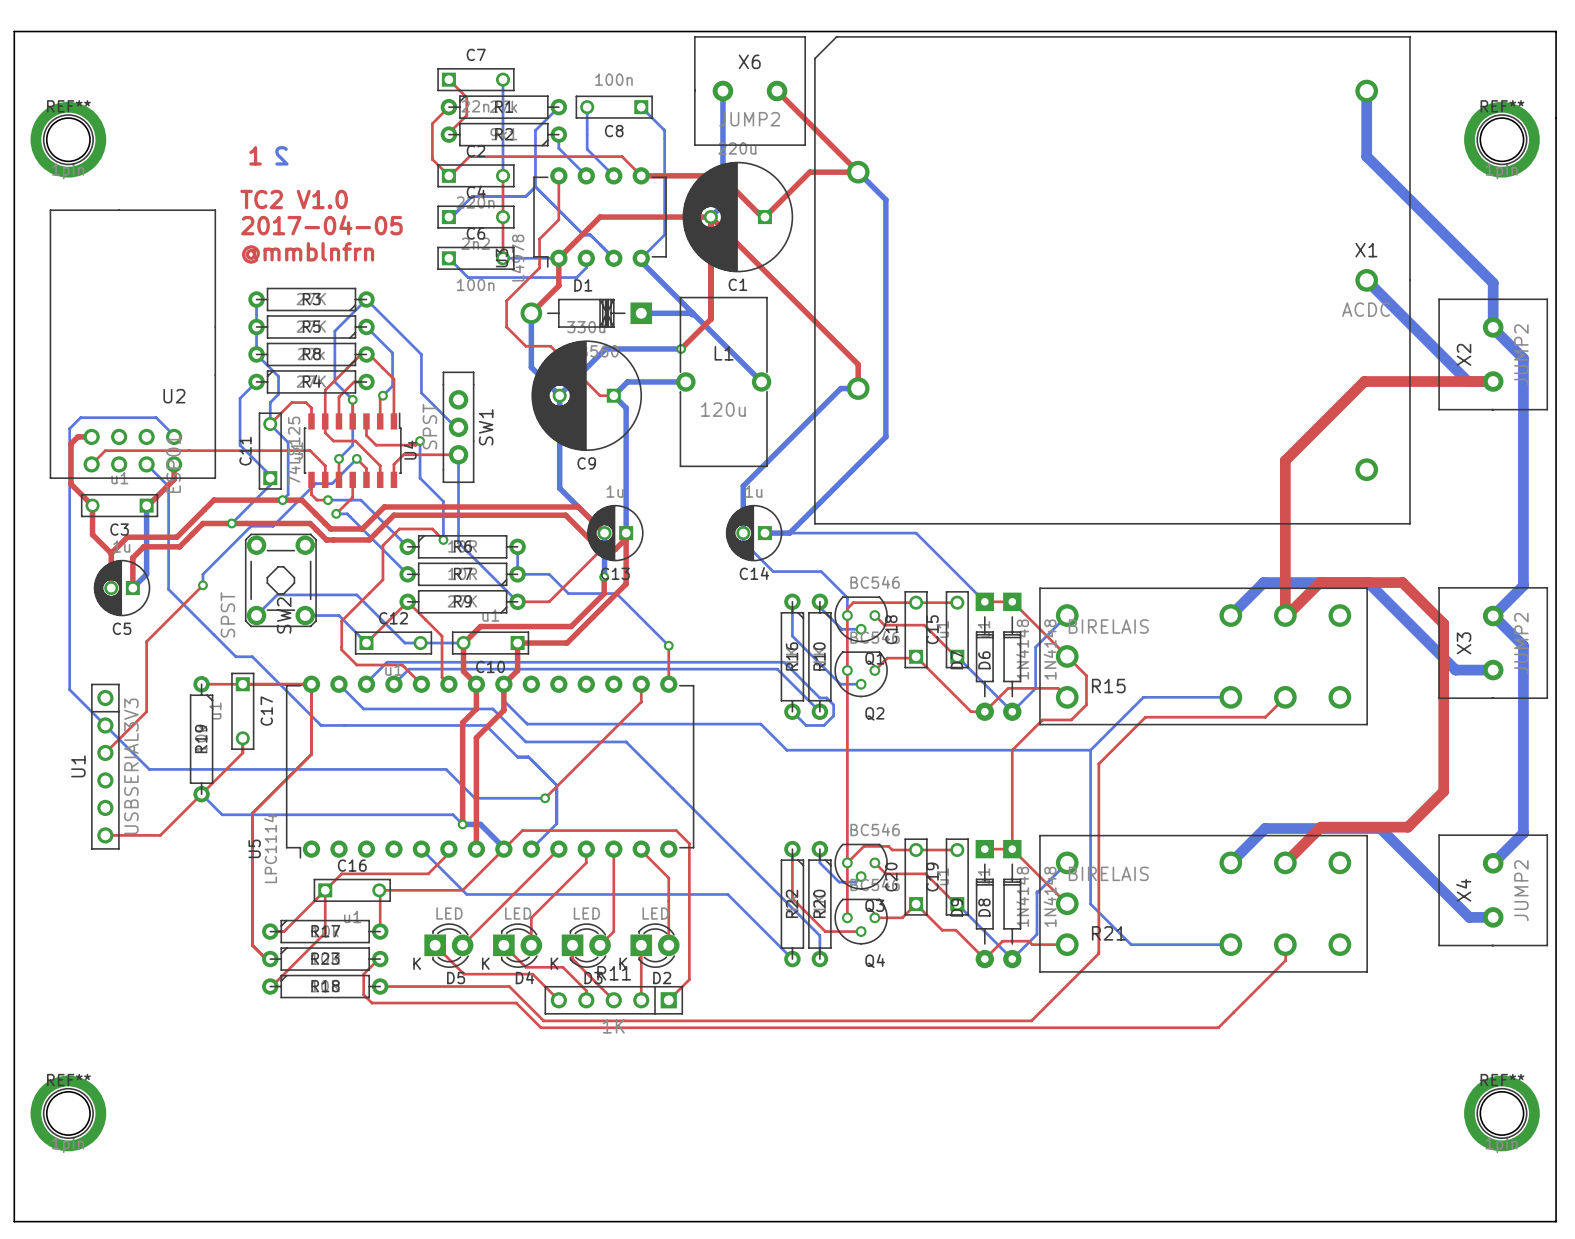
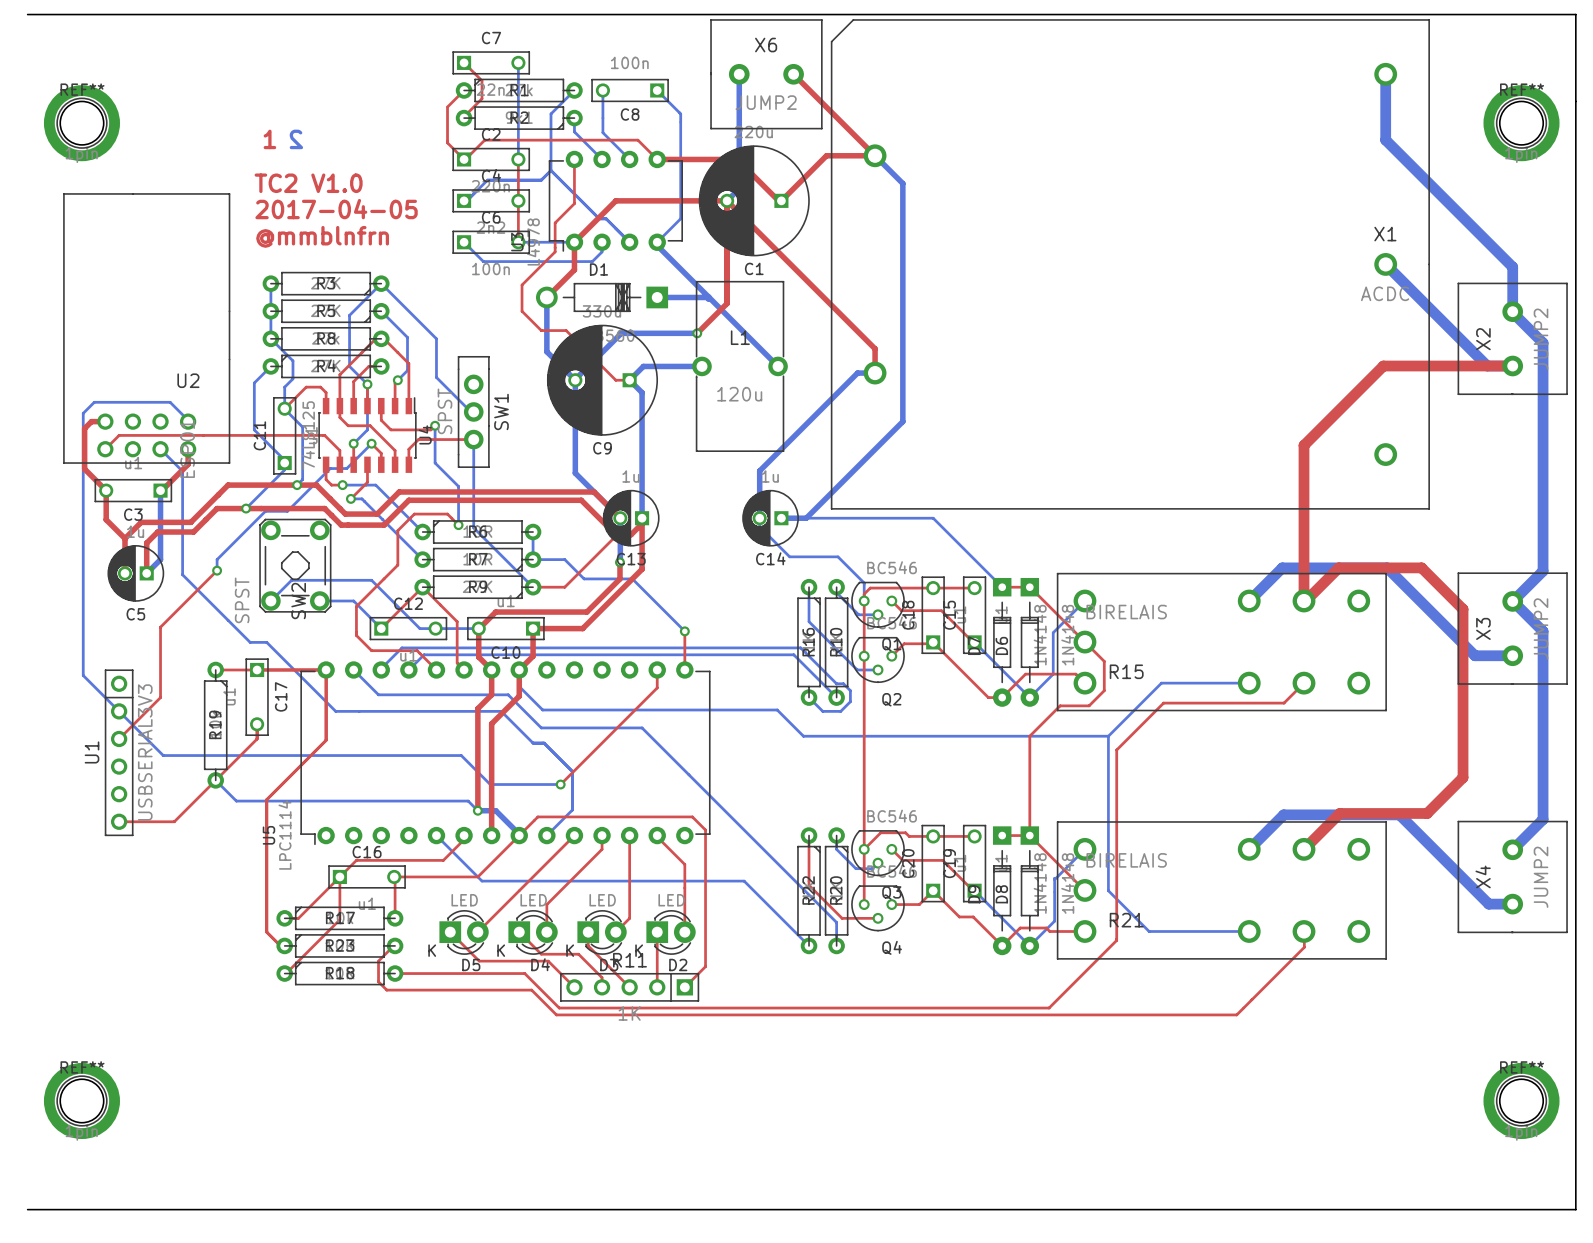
board edge: (14, 31) (14, 1221) -> none

